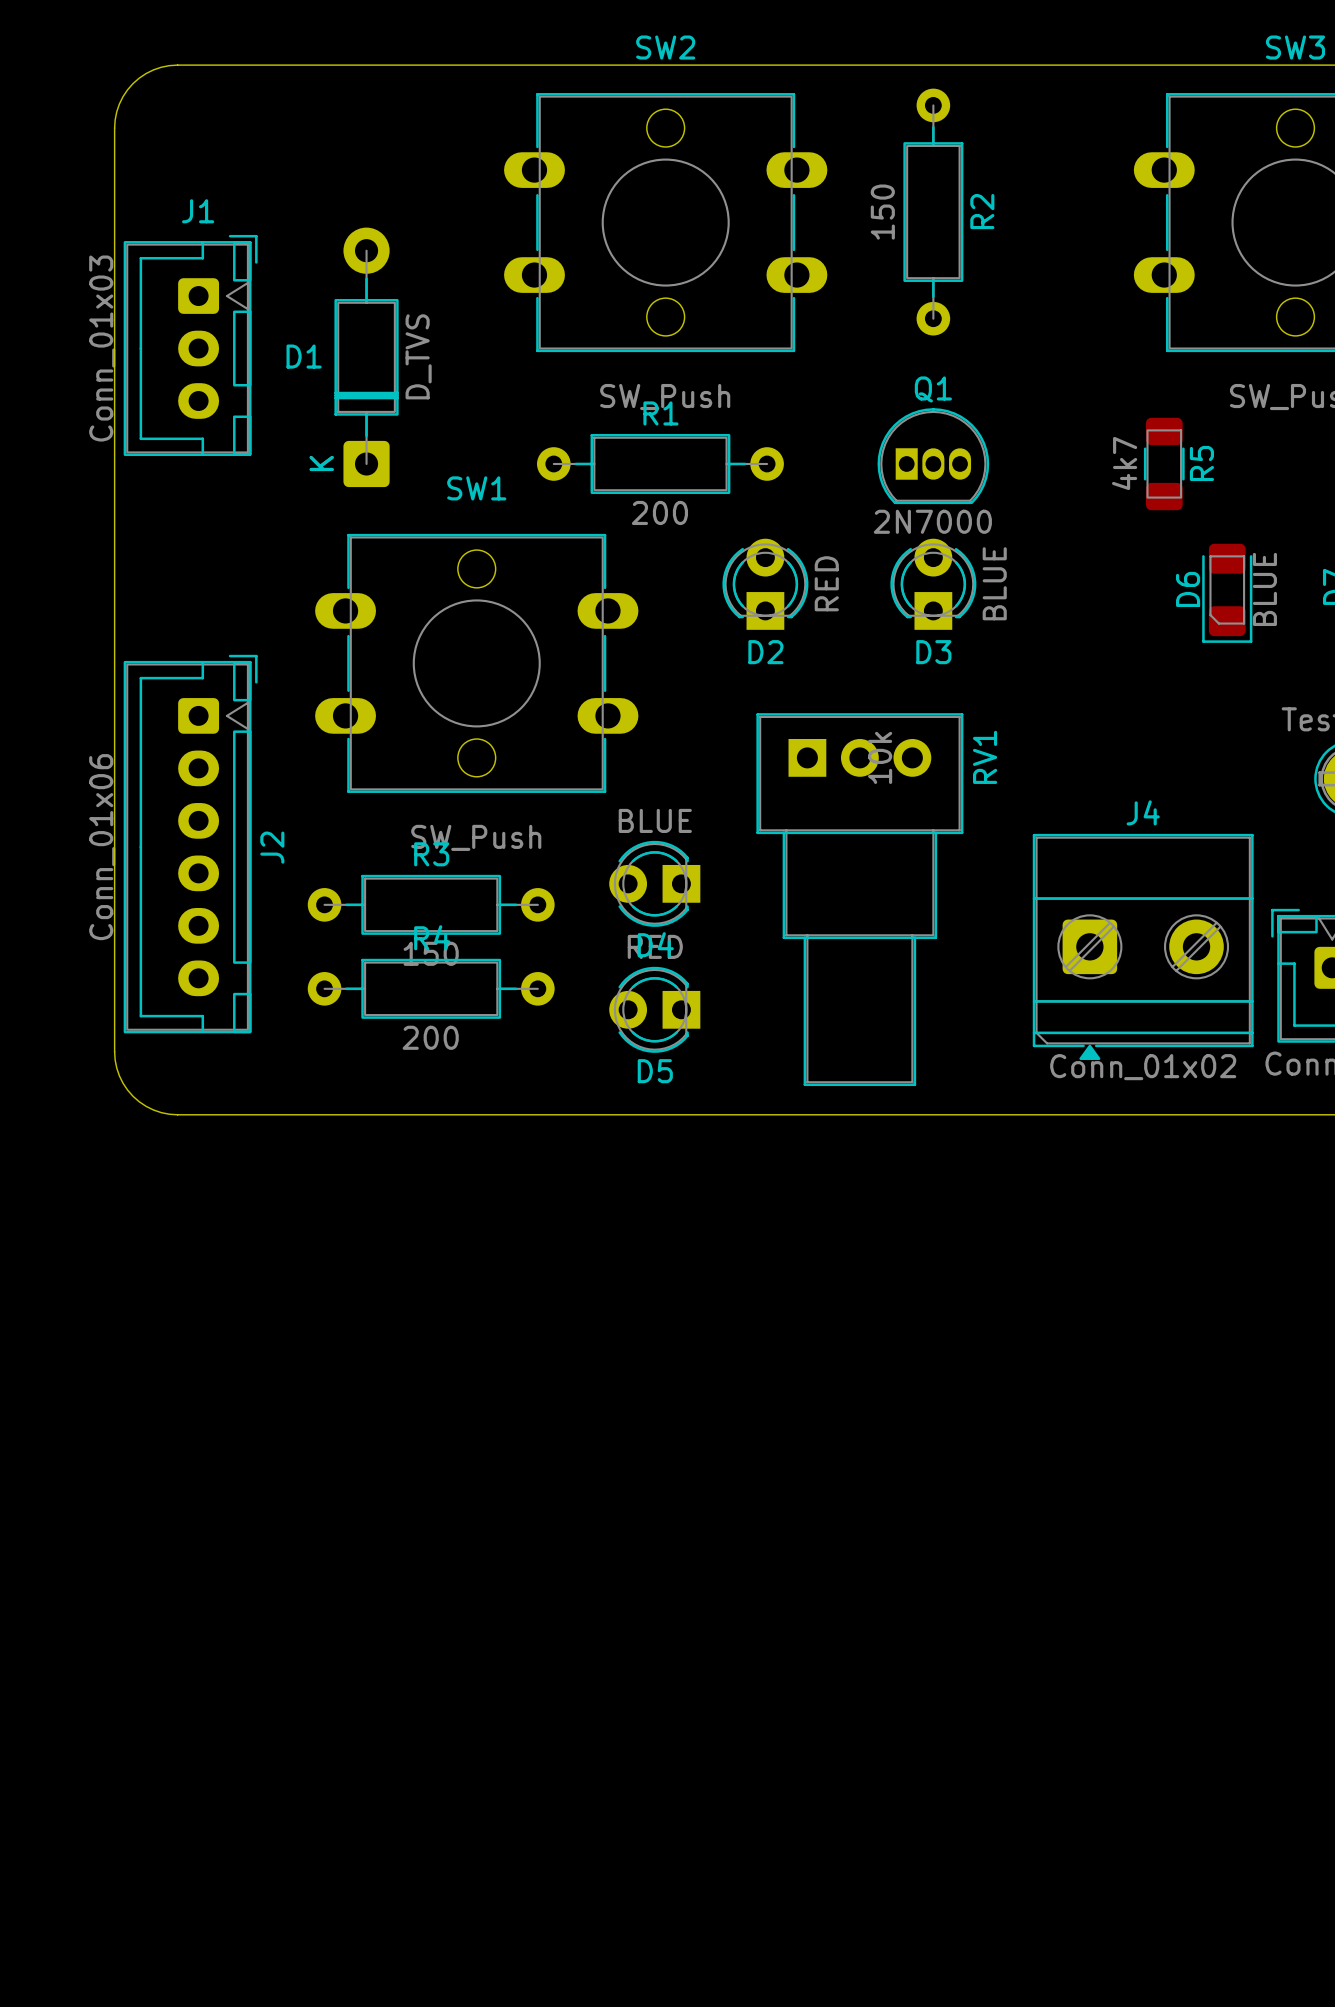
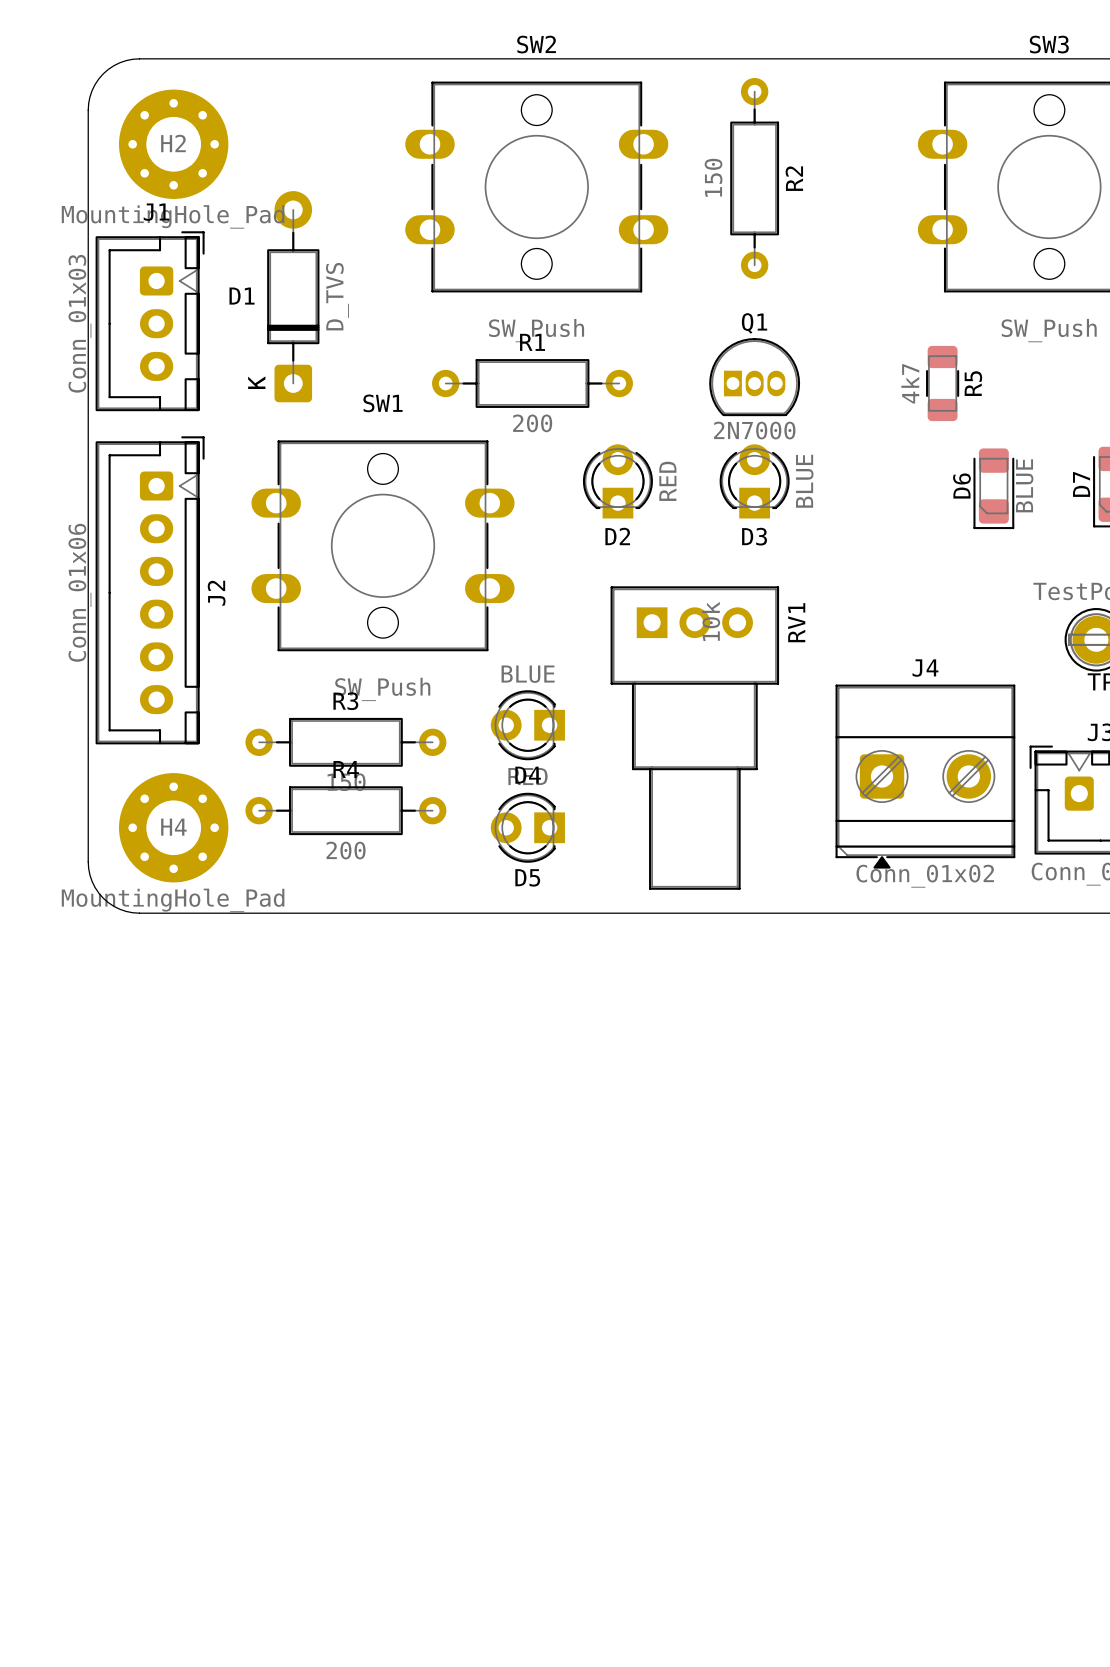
H2: none -> MountingHole_Pad (173, 144)
J1 position: (190, 345) -> (150, 321)
J2 position: (190, 844) -> (150, 590)
H4: none -> MountingHole_Pad (173, 827)

